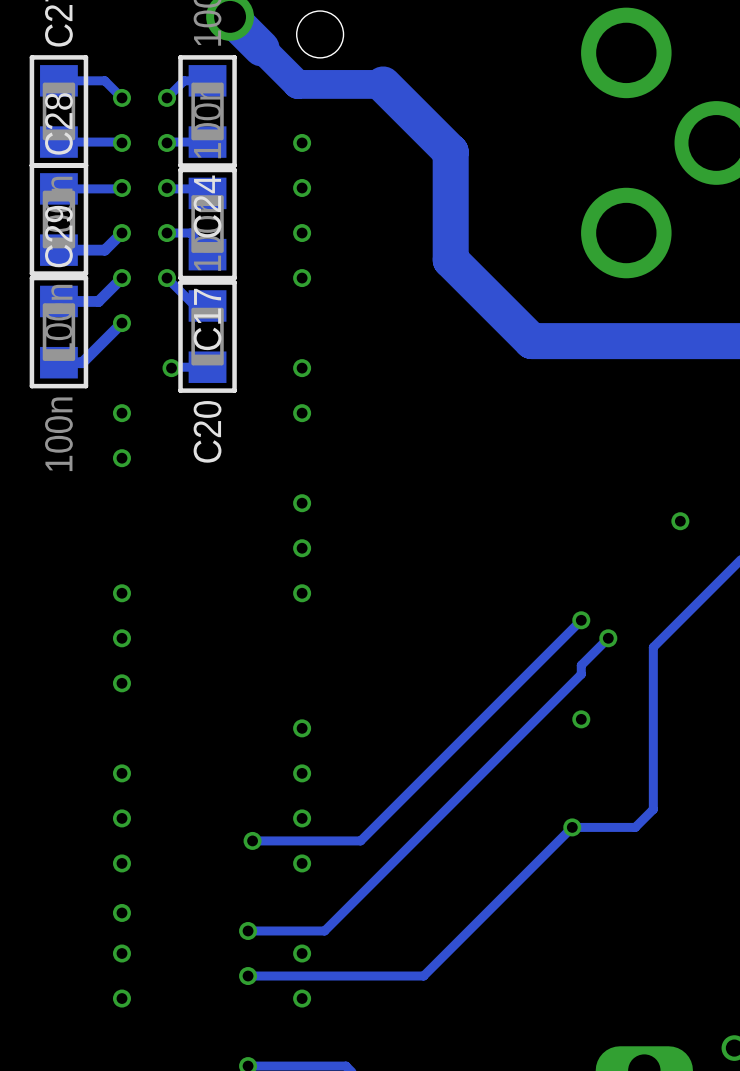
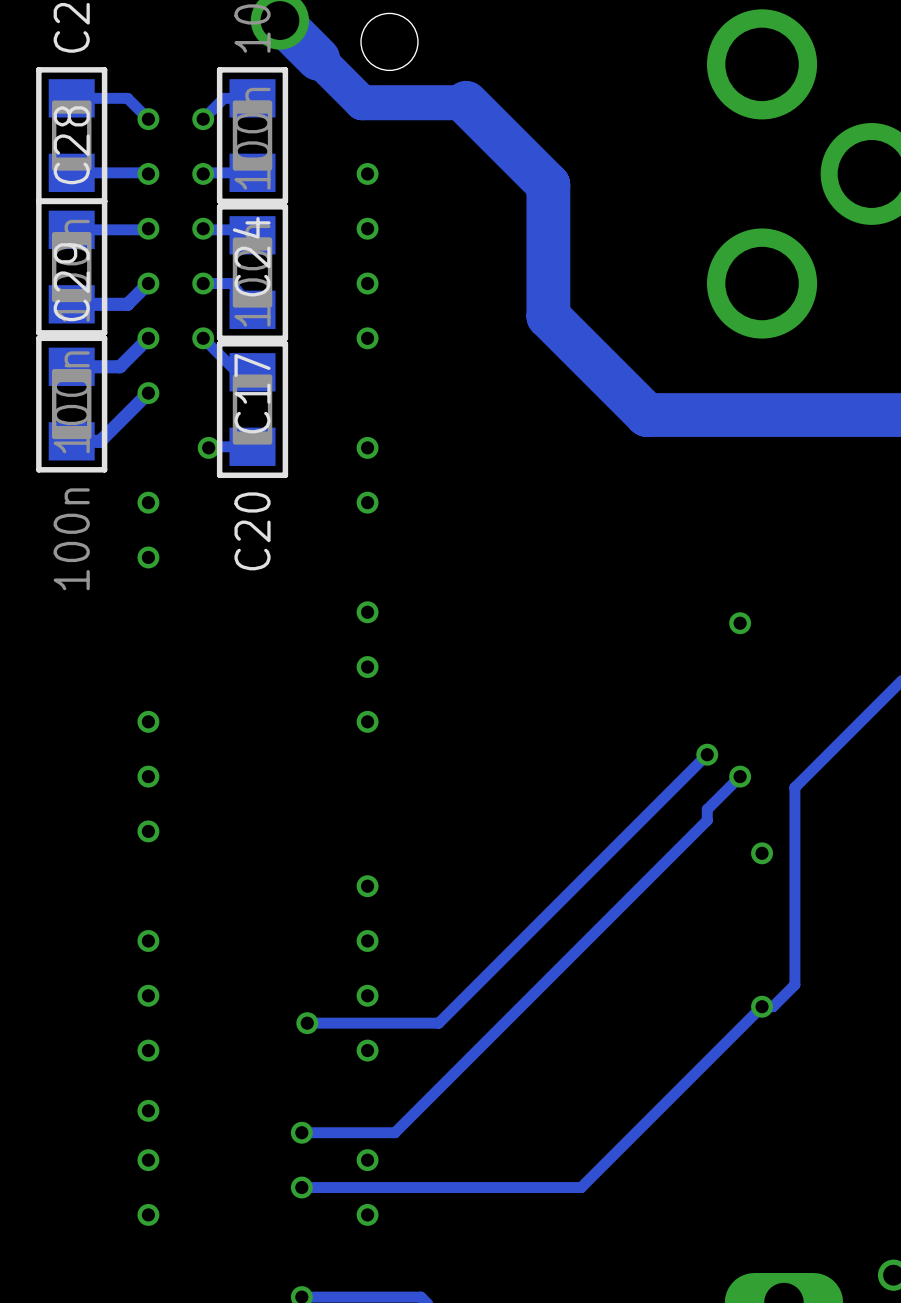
via position: (680, 521) -> (740, 623)
via position: (581, 719) -> (762, 853)
via position: (572, 827) -> (762, 1006)
track: (626, 827) (572, 827) (423, 976) -> (762, 1006) (581, 1187) (515, 1187)

